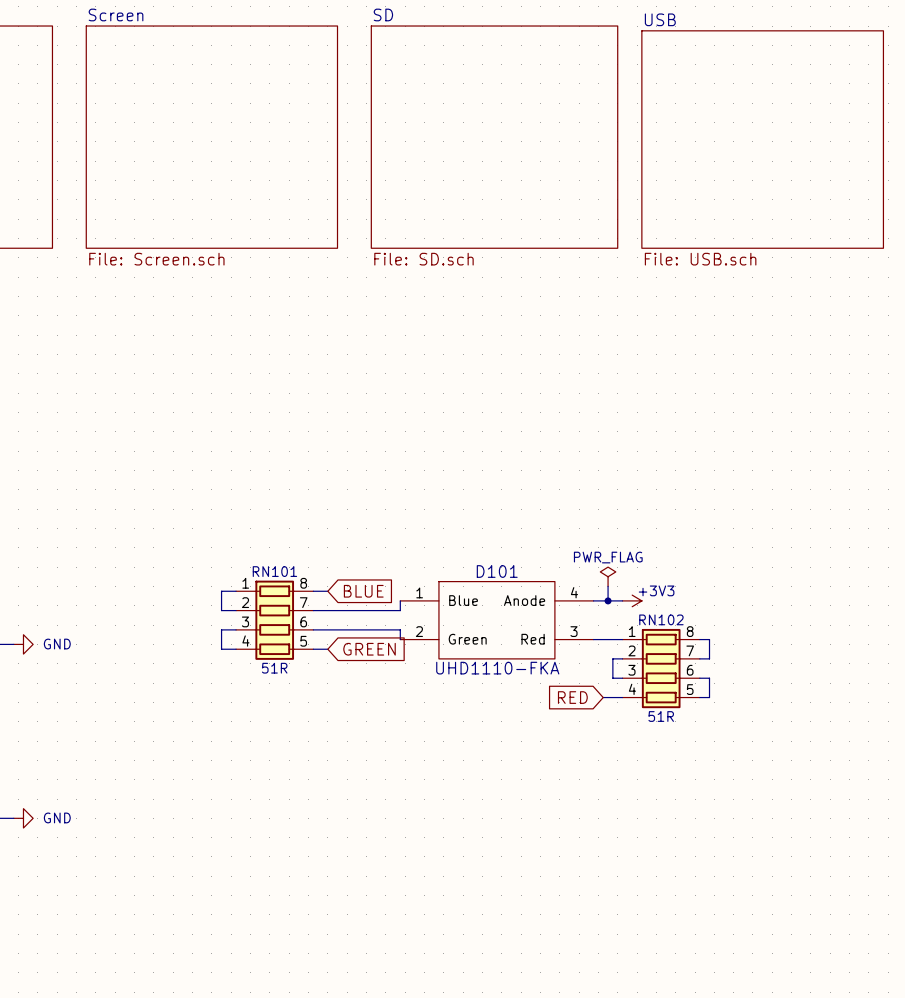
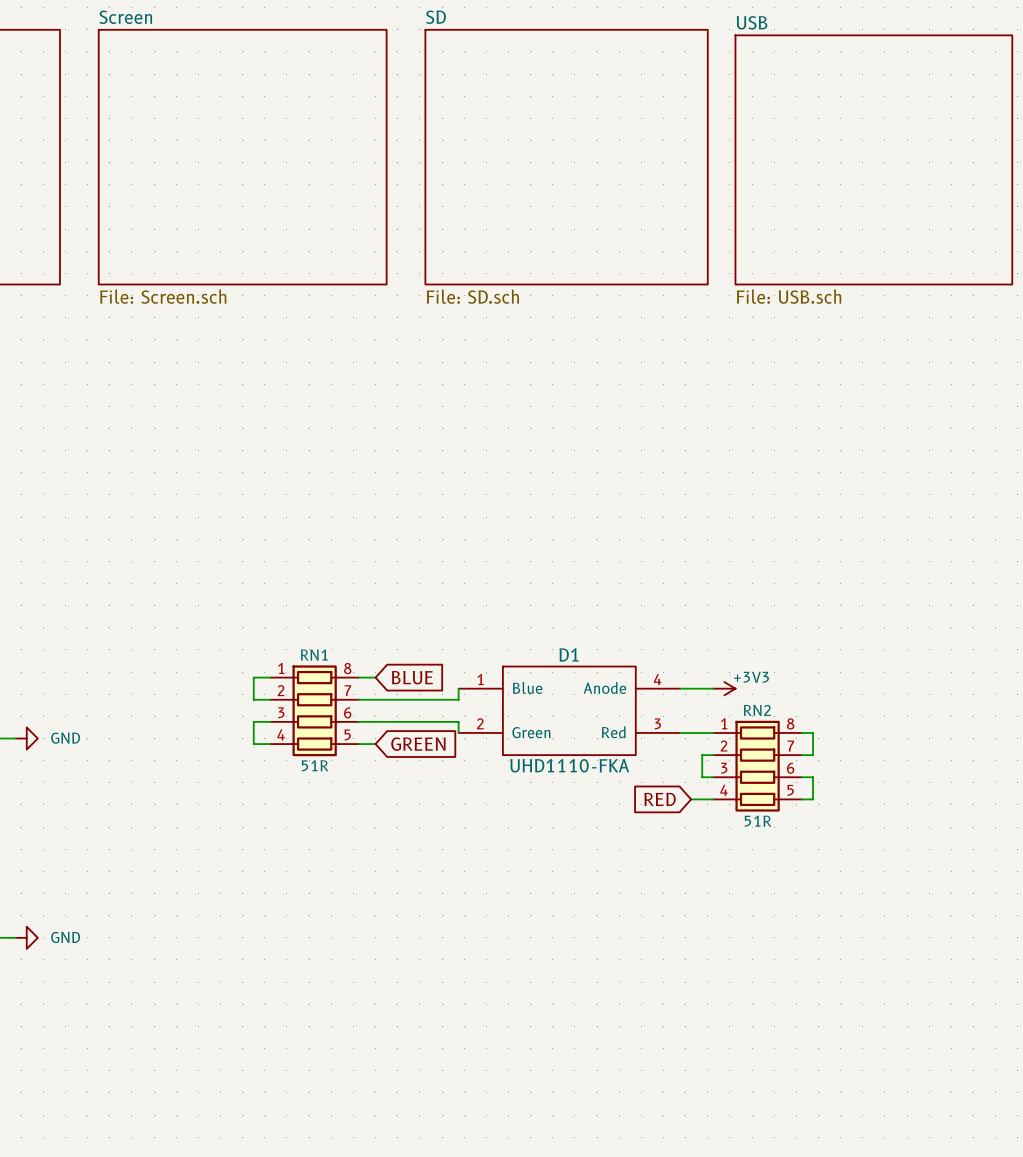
RN101 name: RN101 (274, 571) -> RN1 (314, 655)
D101 name: D101 (497, 571) -> D1 (569, 654)
power symbol: PWR_FLAG (608, 576) -> none
wire: (608, 586) (608, 600) -> none
junction: (608, 600) -> none
RN102 name: RN102 (661, 619) -> RN2 (757, 710)

